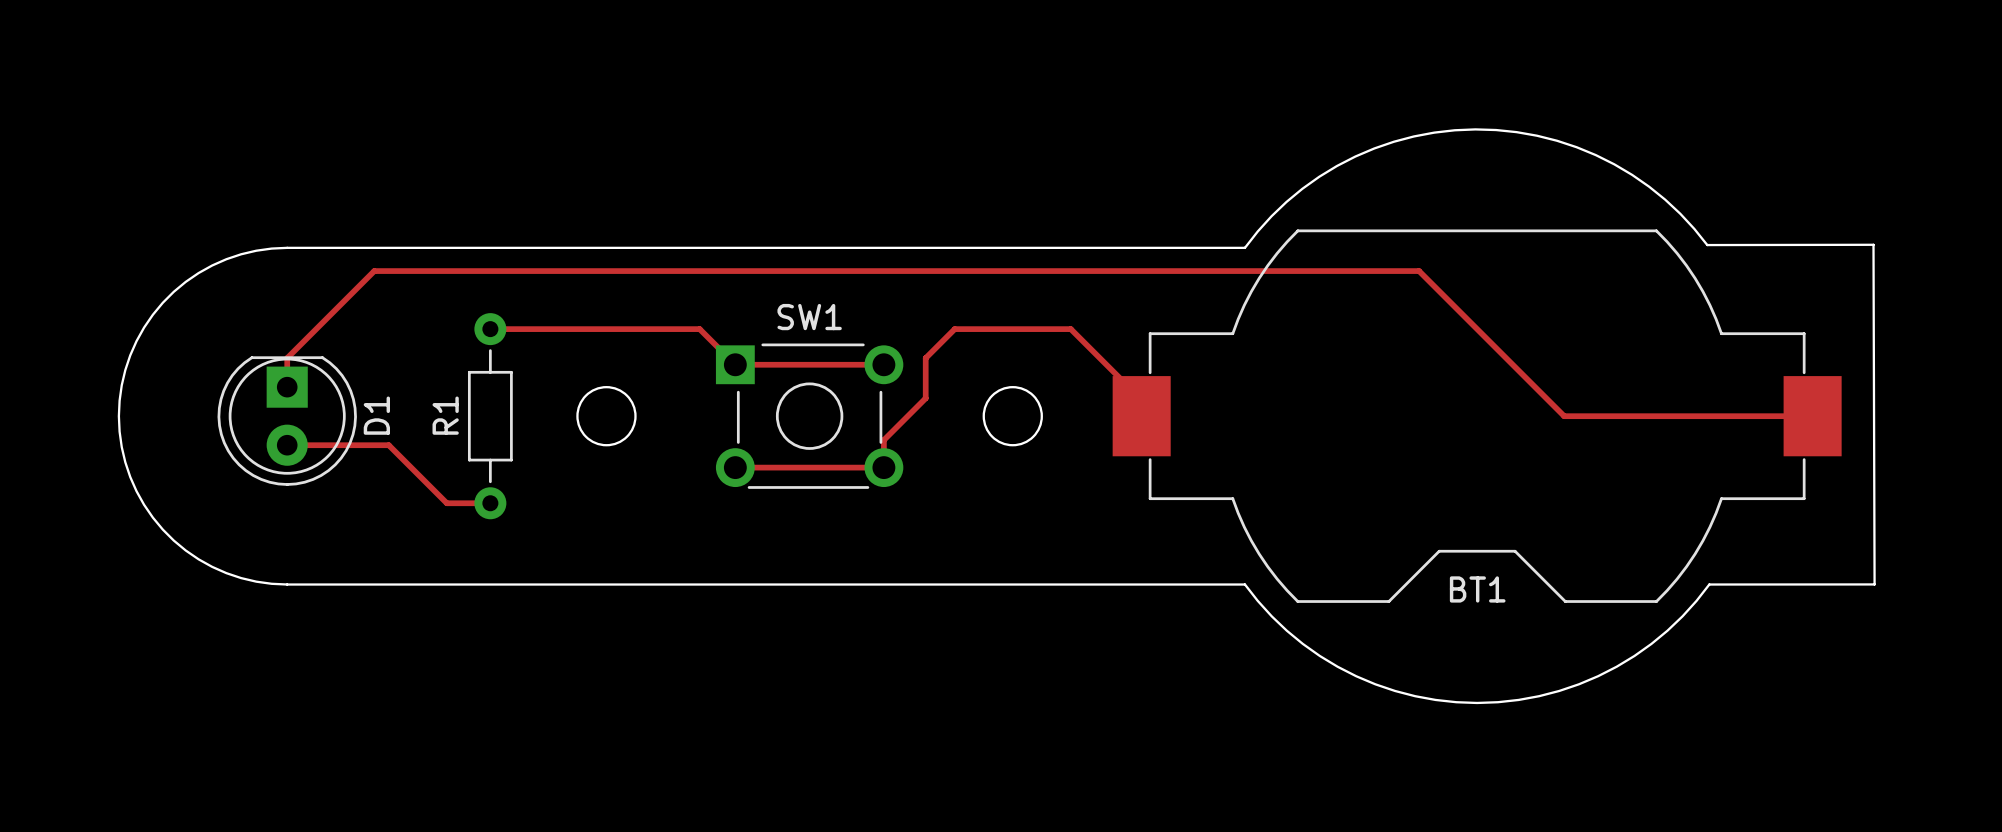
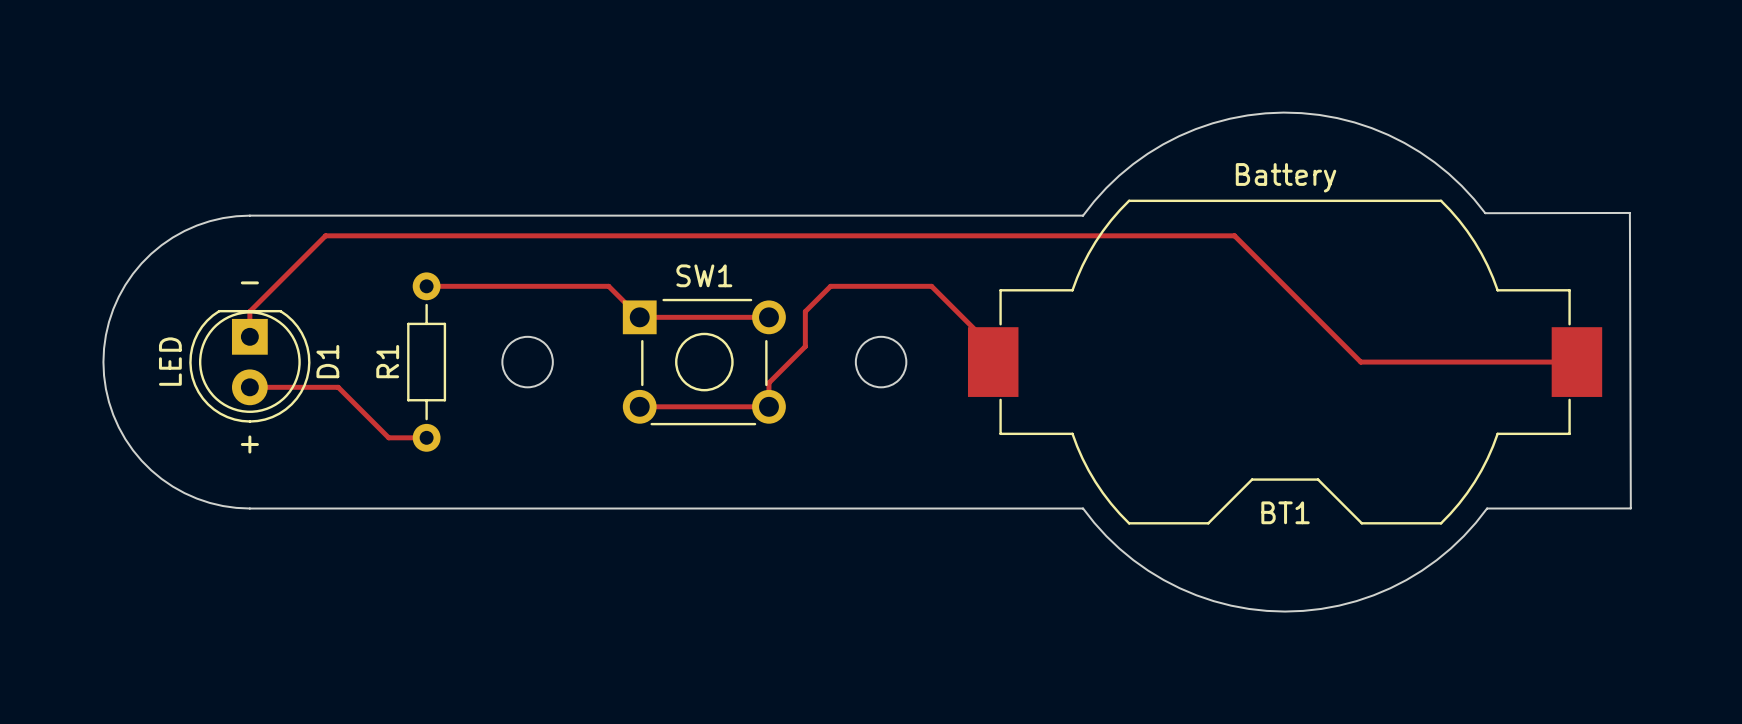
BT1 value: none -> Battery (1286, 177)
text: none -> - (249, 282)
D1 value: none -> LED (170, 361)
text: none -> + (249, 444)

